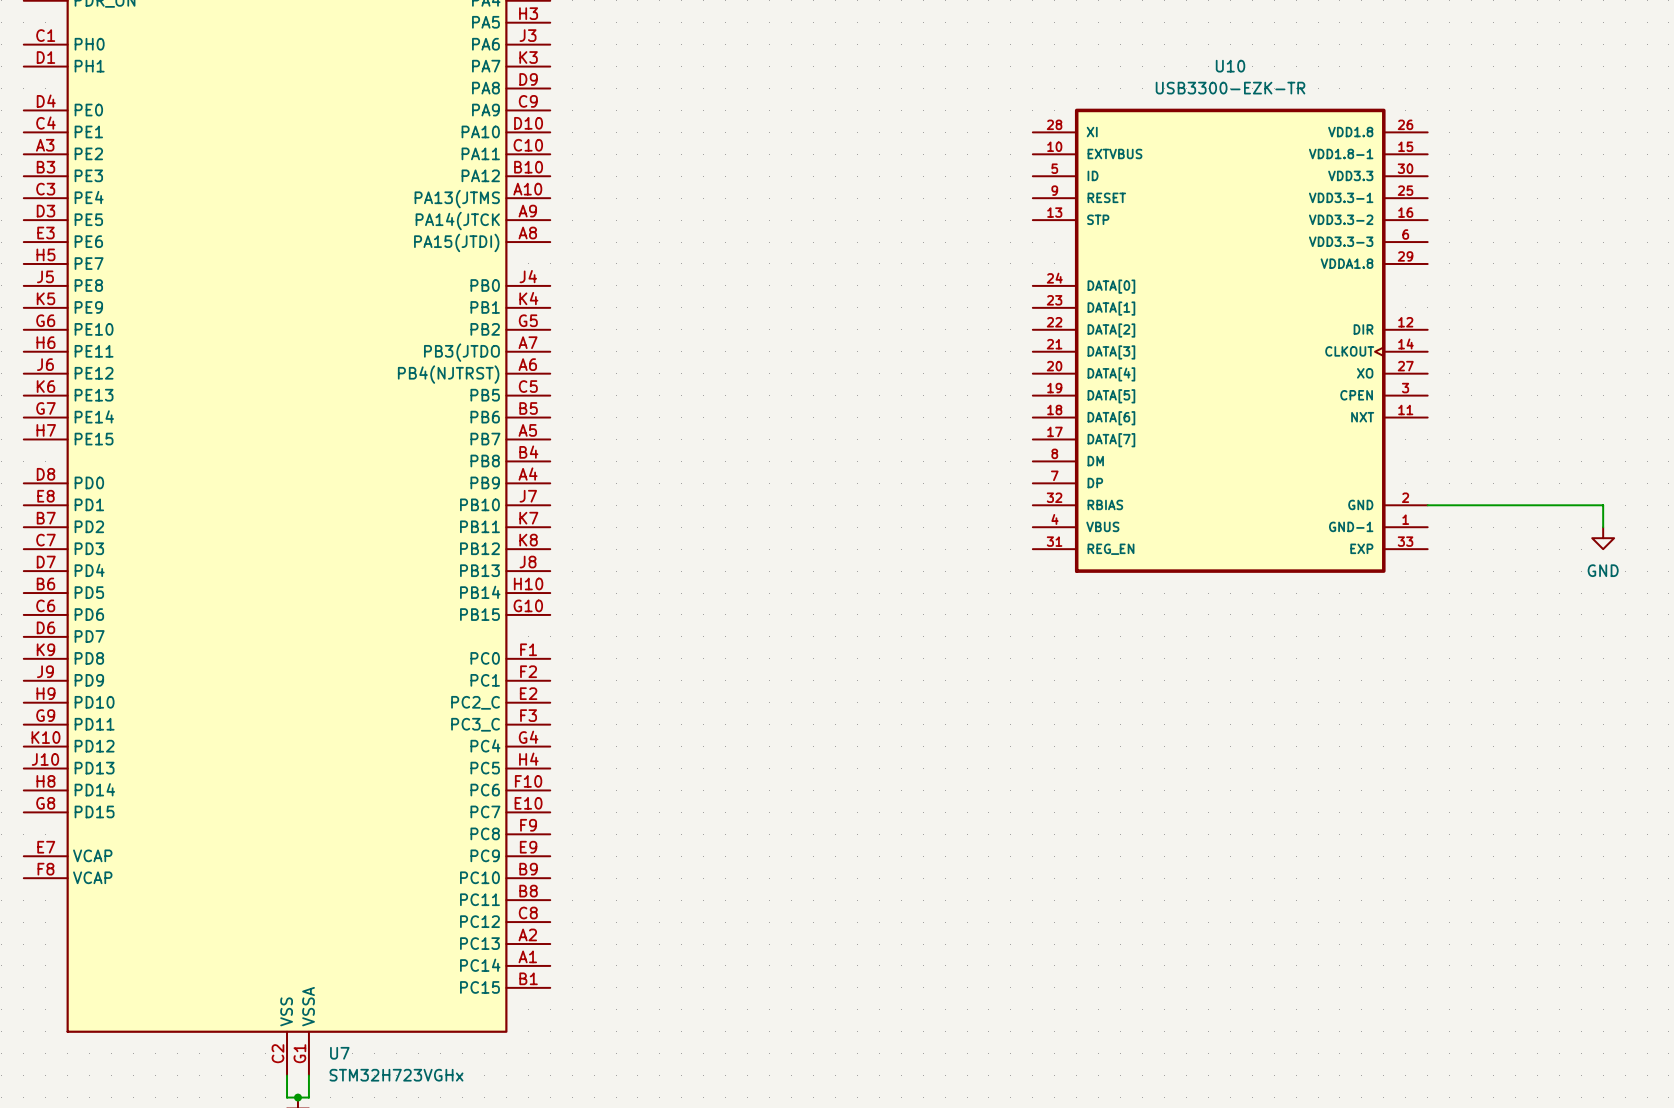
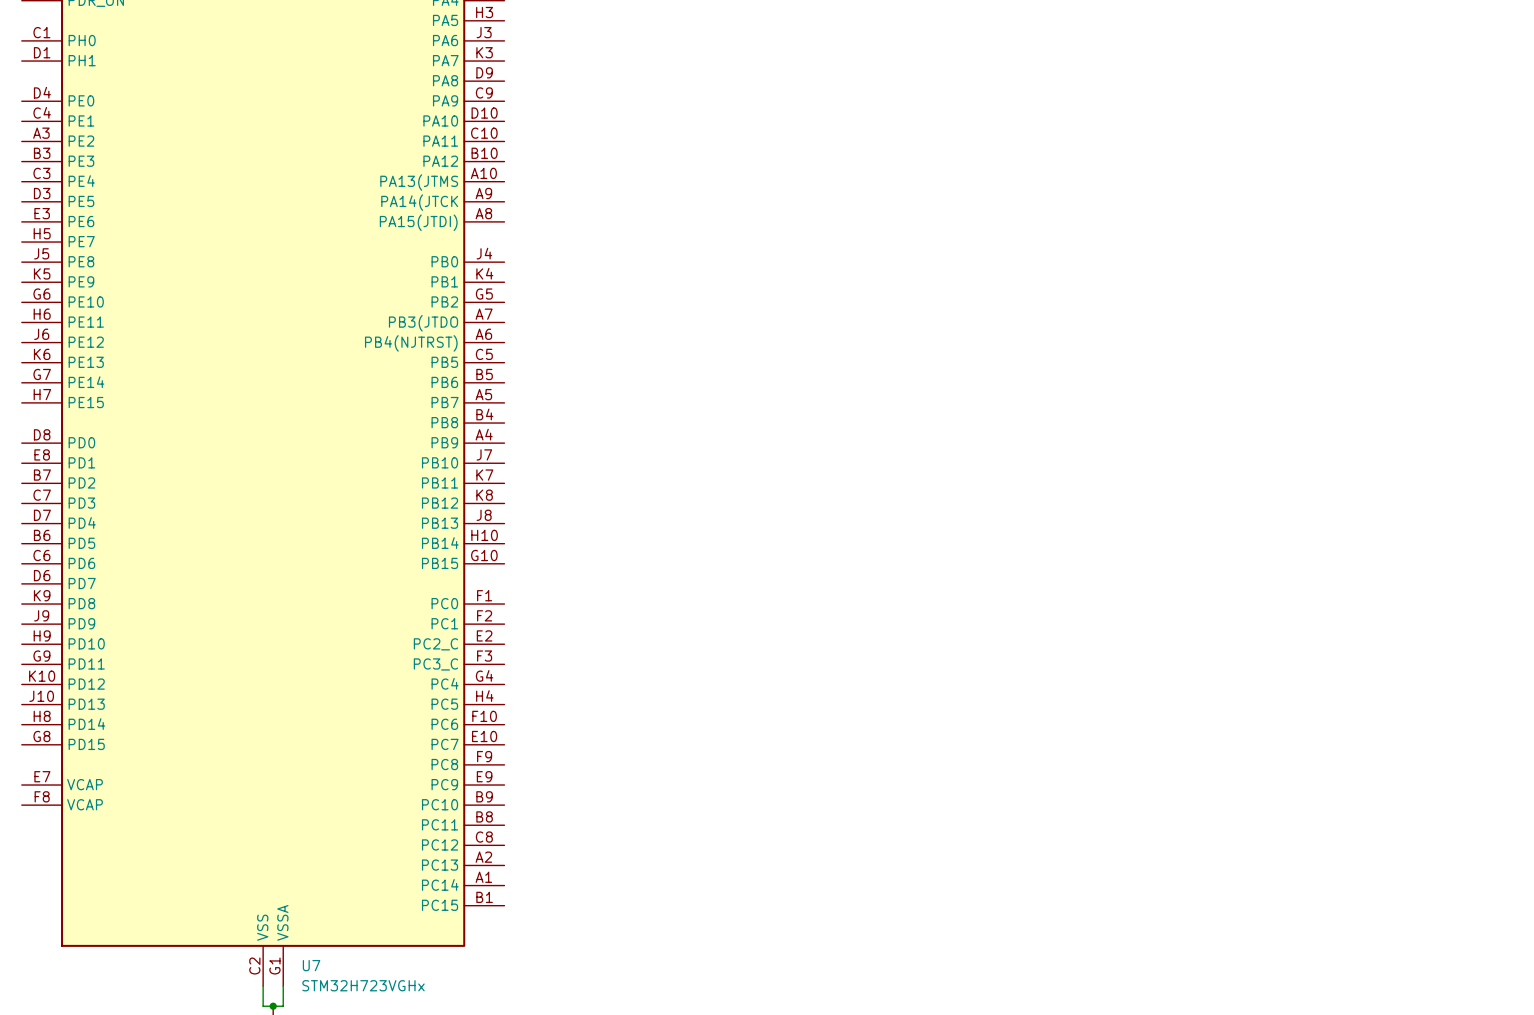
U10: USB3300-EZK-TR (1230, 340) -> none
wire: (1427, 505) (1603, 505) (1603, 527) -> none
power symbol: GND (1603, 538) -> none

